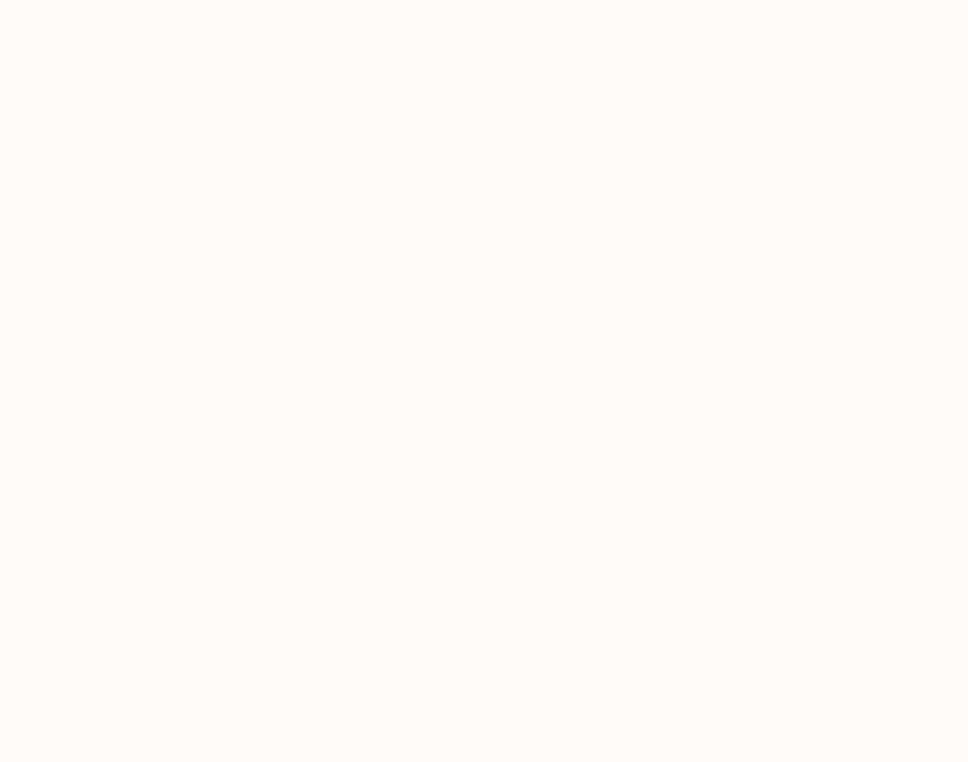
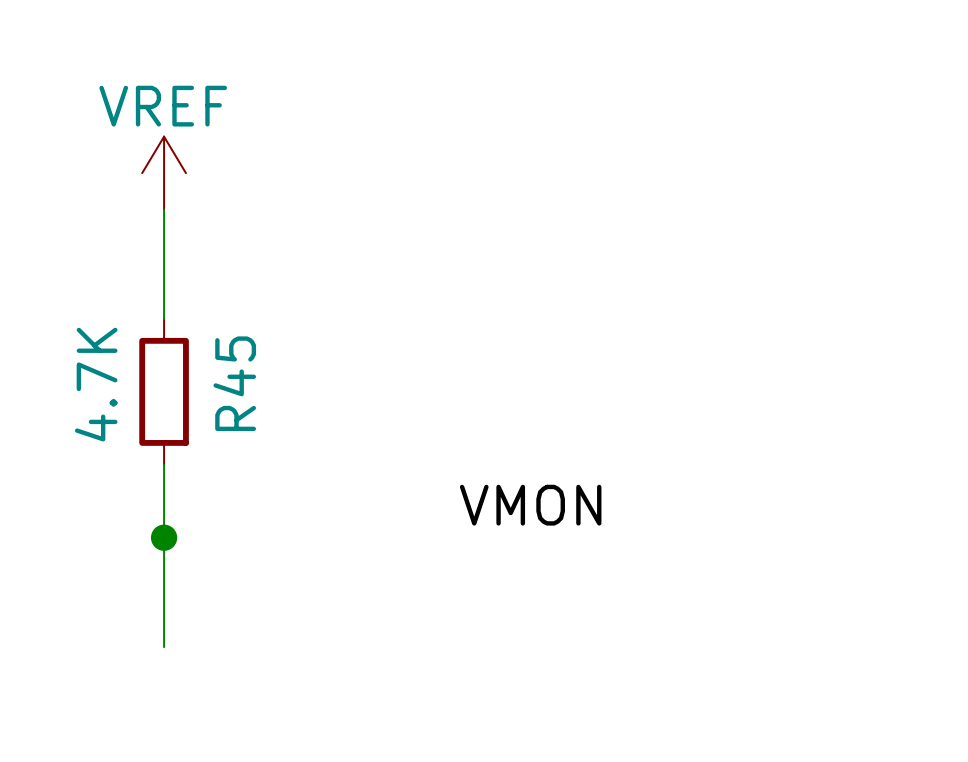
power symbol: none -> VREF (164, 173)
wire: none -> (164, 209) (164, 318)
R45: none -> 4.7K (164, 391)
wire: none -> (164, 464) (164, 647)
label: none -> VMON (530, 505)
junction: none -> (164, 537)

